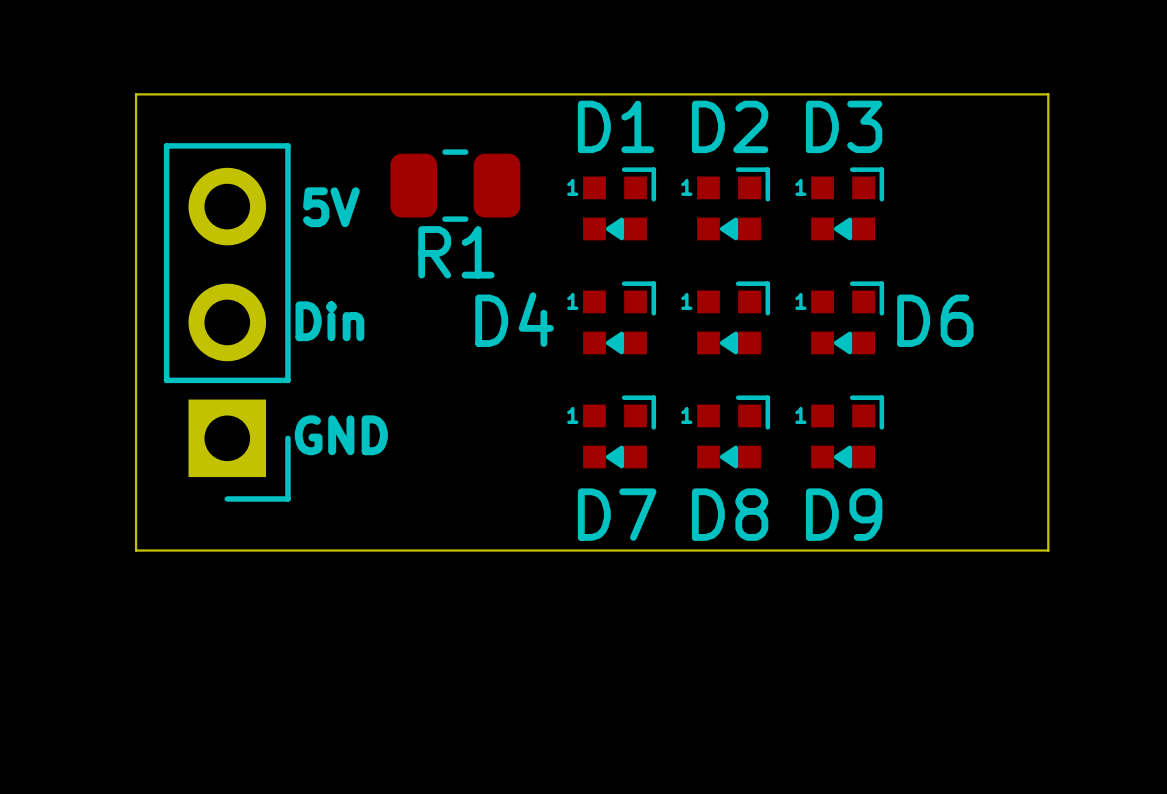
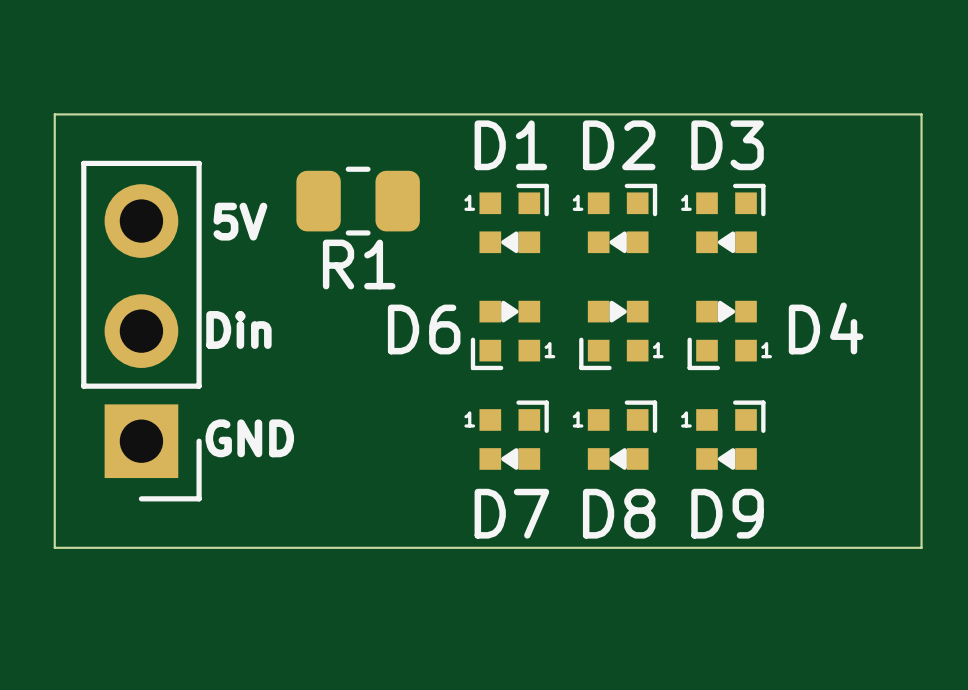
D4 rotation: 0° (619, 317) -> 180° (722, 335)
D4 position: (619, 317) -> (722, 335)
part rotation: 0° (733, 317) -> 180° (613, 335)
D6 rotation: 0° (847, 317) -> 180° (505, 335)
D6 position: (847, 317) -> (505, 335)

